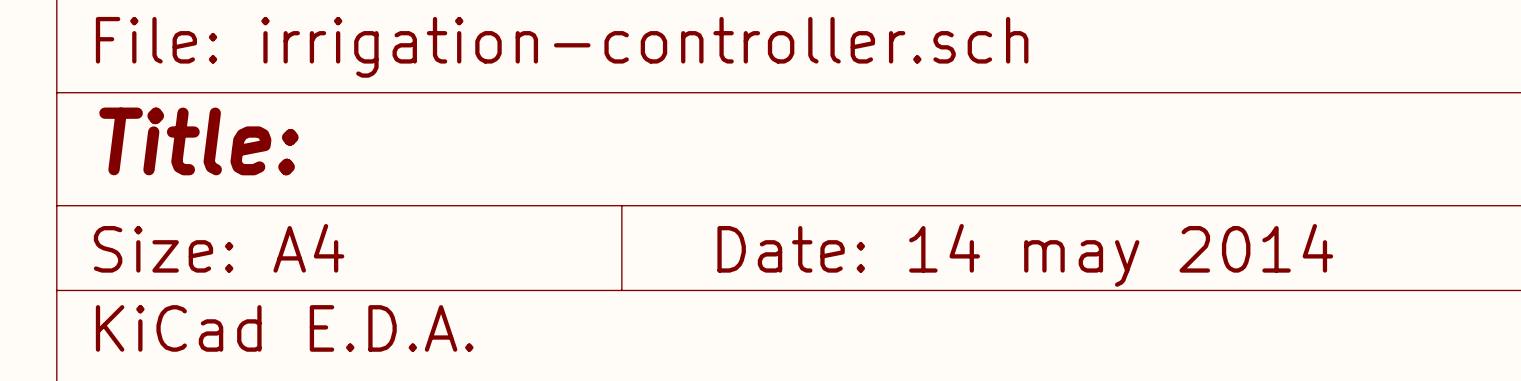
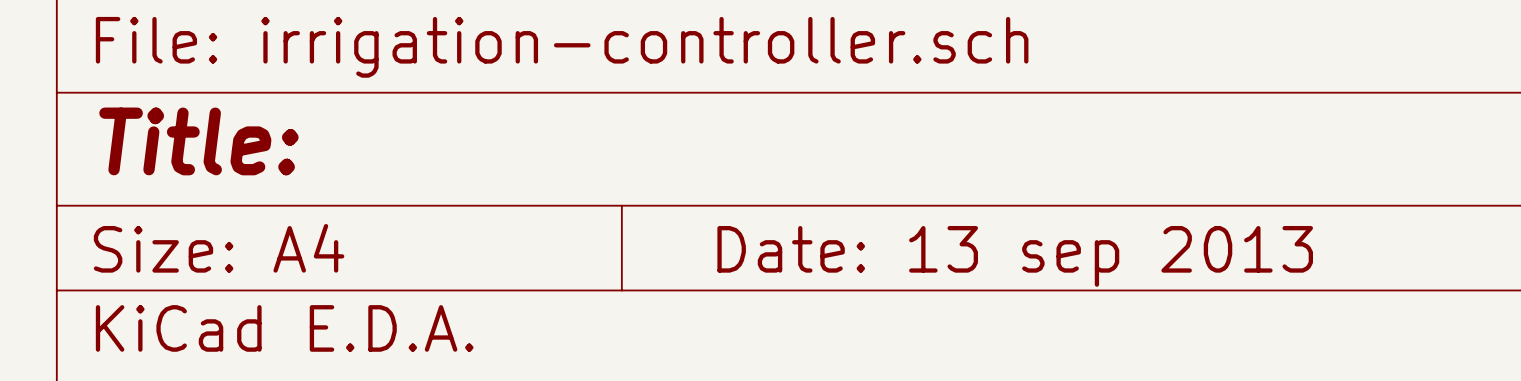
title block: Date: 14 may 2014 (1025, 255) -> Date: 13 sep 2013 (1015, 256)

